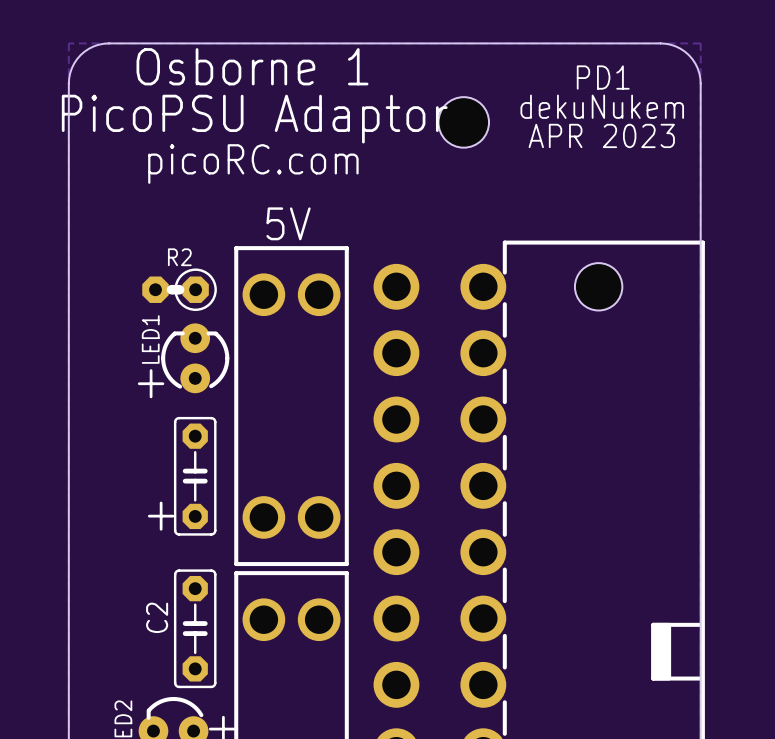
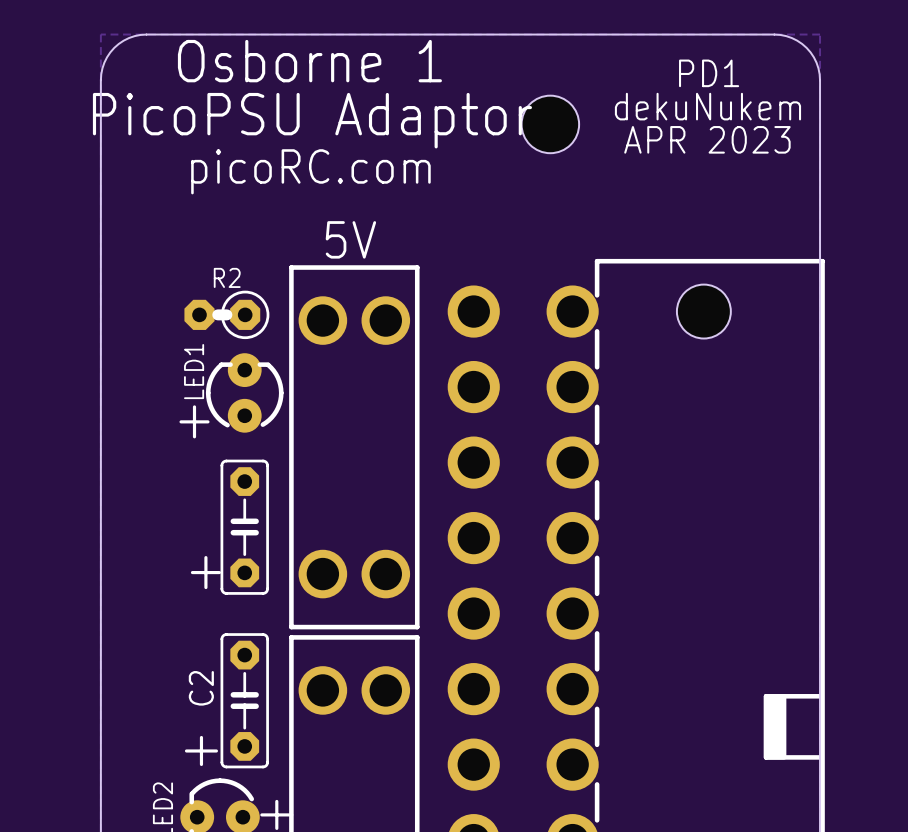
text: none -> + (201, 750)

